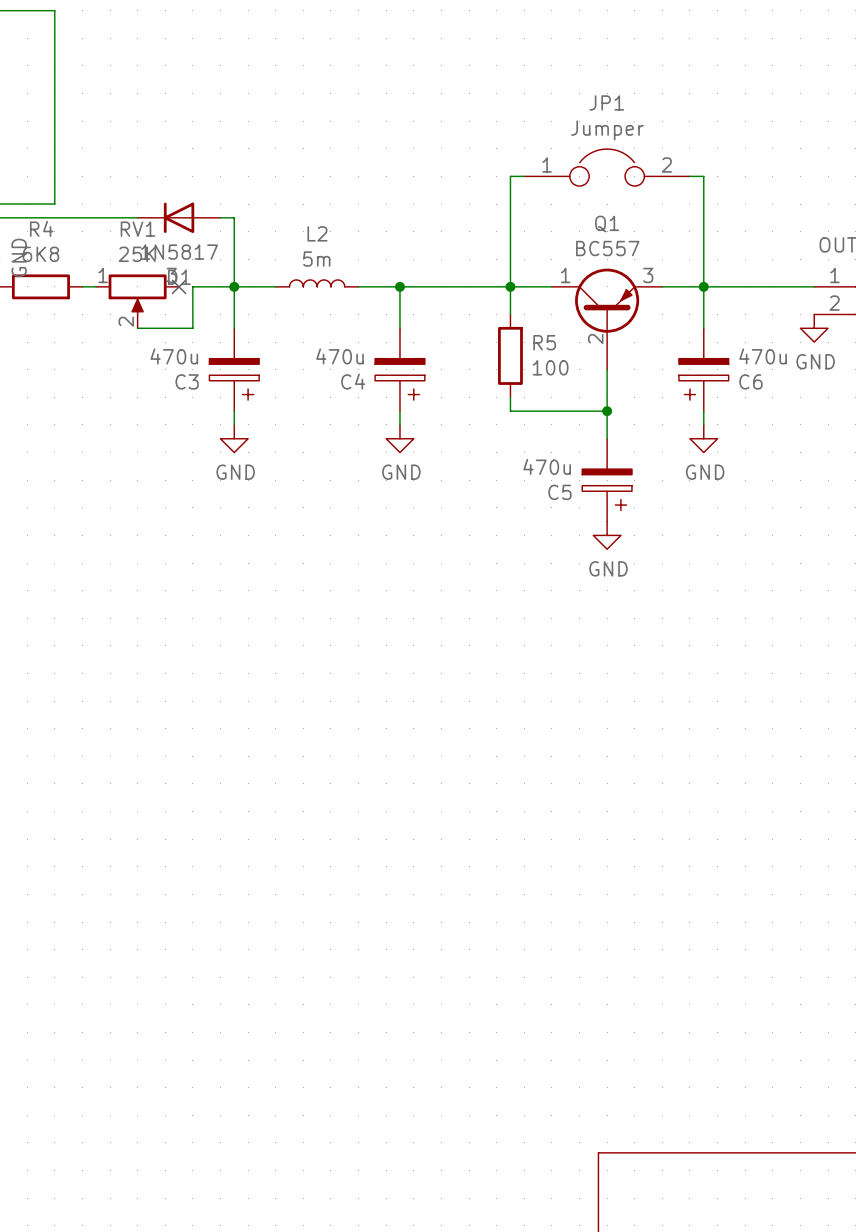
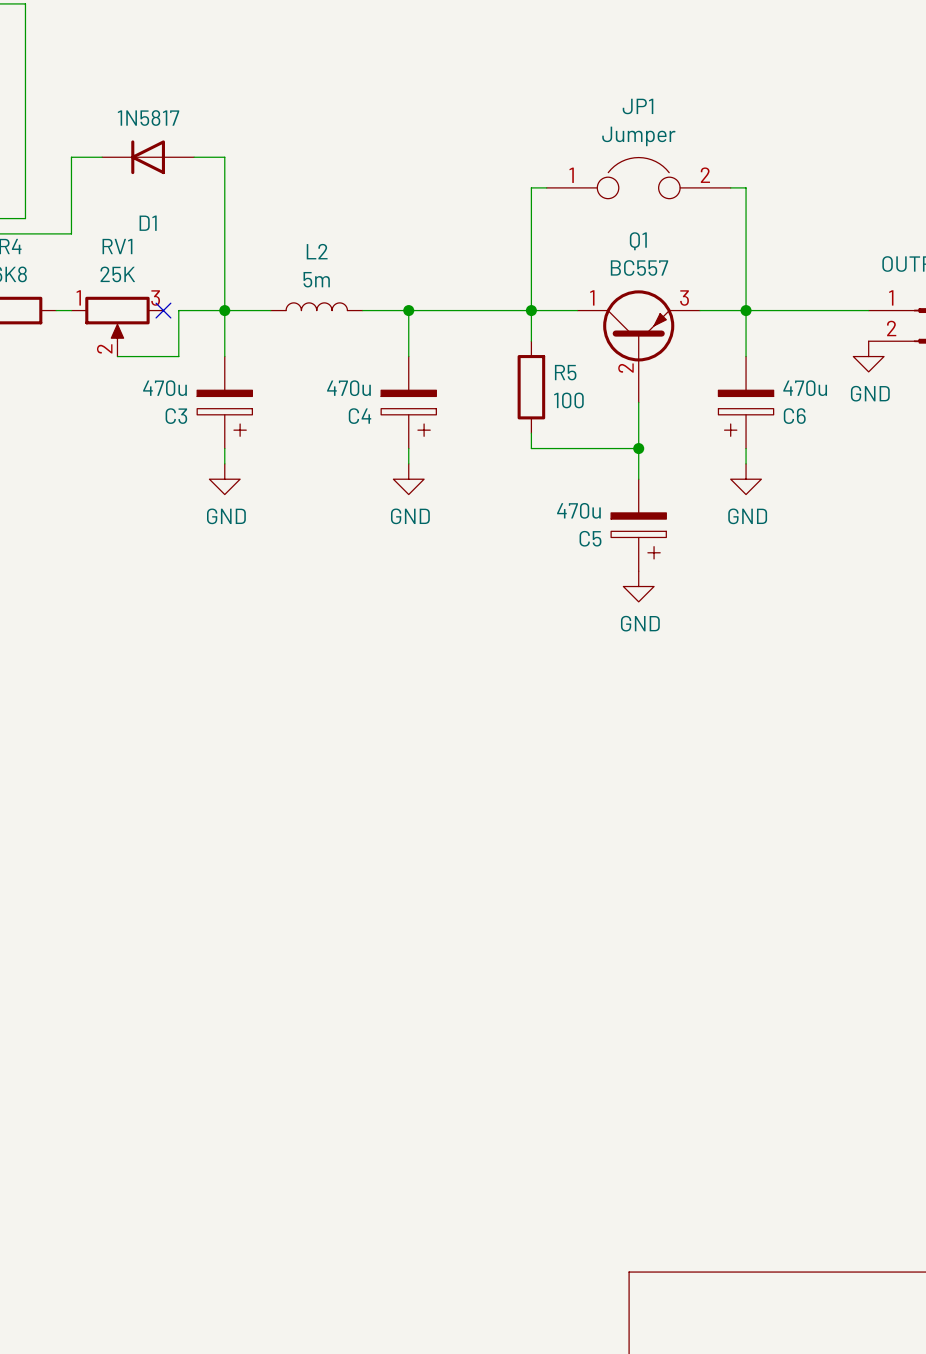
wire: (96, 217) (137, 217) -> (71, 233) (71, 157) (102, 157)
D1 position: (179, 217) -> (148, 157)
wire: (220, 217) (234, 217) -> (194, 157) (224, 157) (224, 233)
D1 value position: 1N5817 (179, 252) -> 1N5817 (148, 118)

